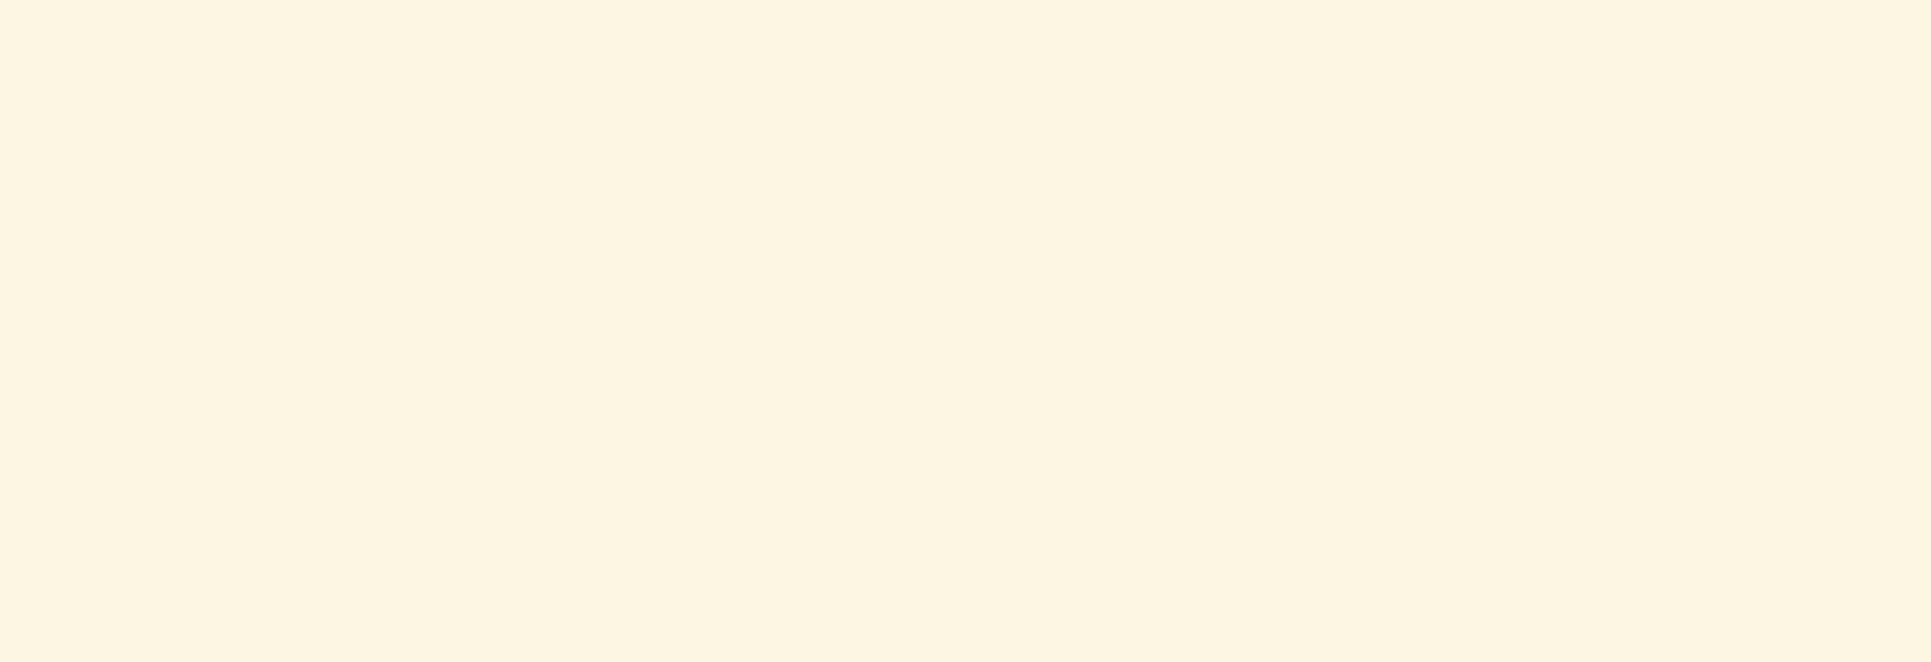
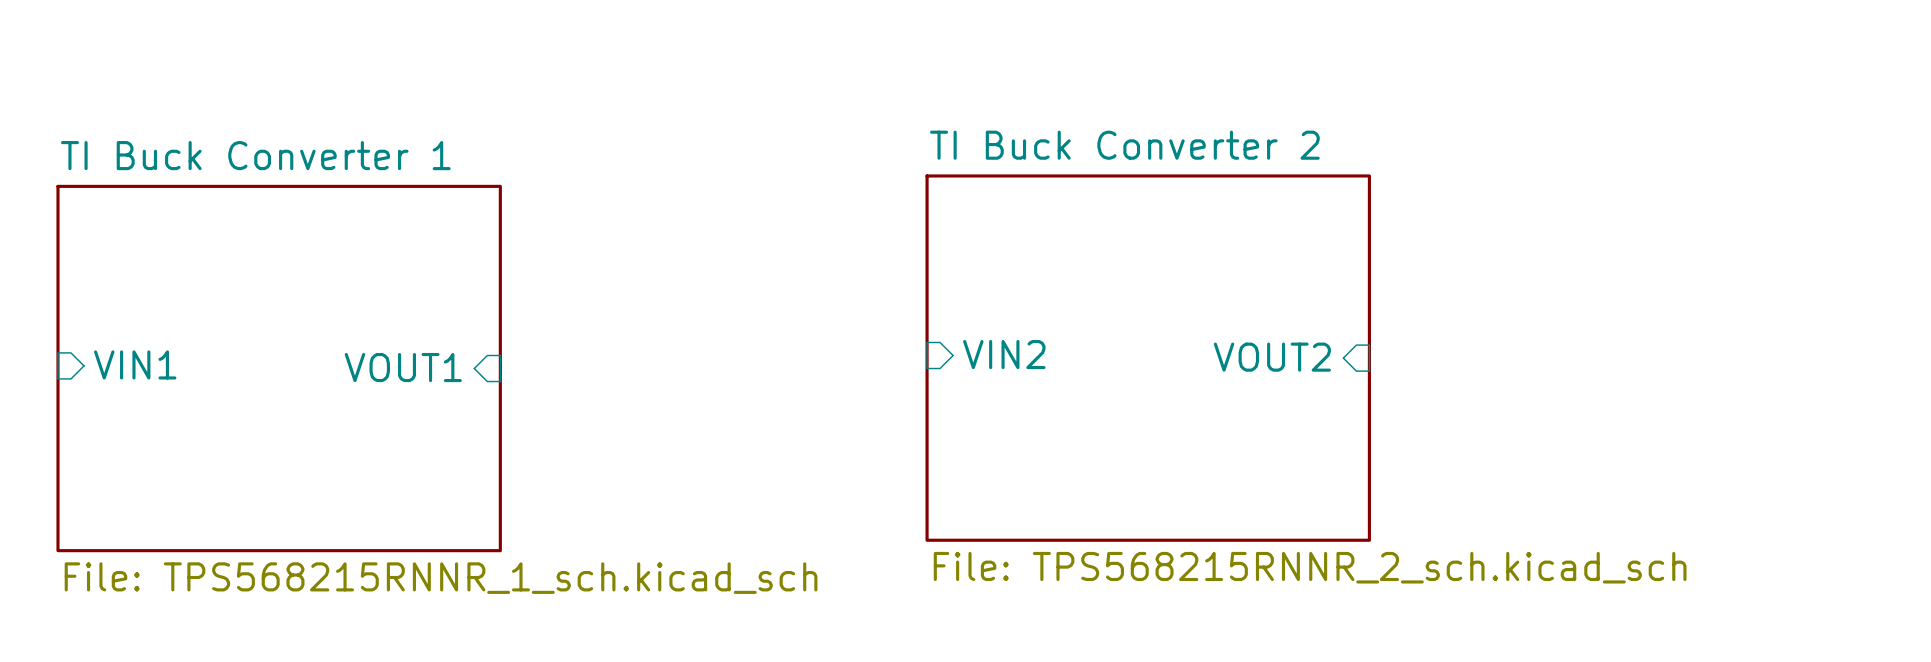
sheet pin: none -> VIN2 (1004, 354)
sheet pin: none -> VOUT2 (1272, 357)
sheet TI Buck Converter 2: none -> File: TPS568215RNNR_2_sch.kicad_sch (1148, 358)
sheet pin: none -> VIN1 (135, 364)
sheet pin: none -> VOUT1 (403, 367)
sheet TI Buck Converter 1: none -> File: TPS568215RNNR_1_sch.kicad_sch (279, 368)

